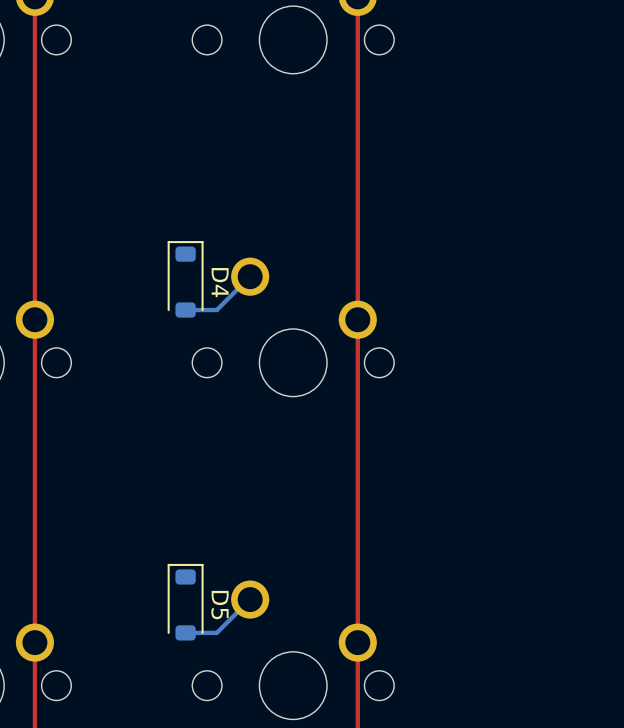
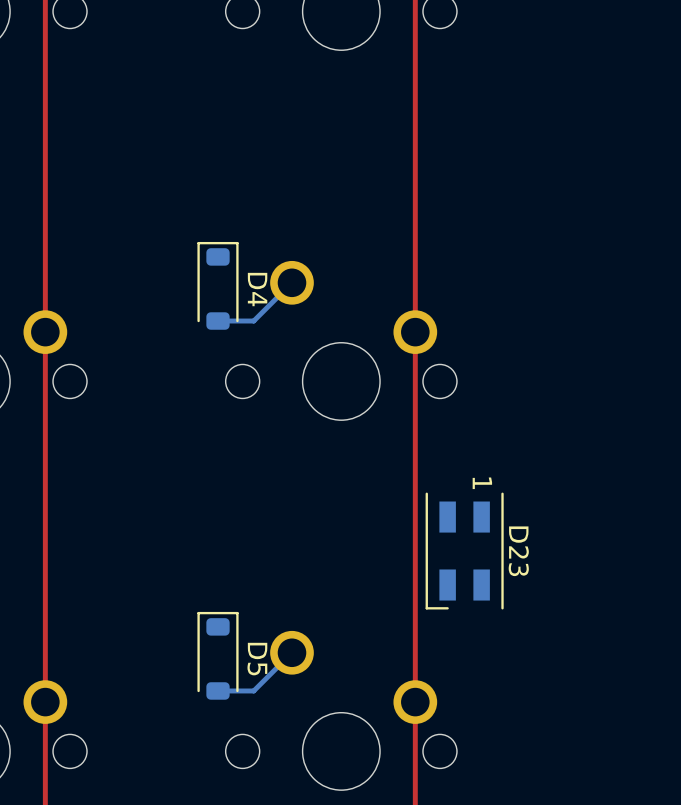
D23: none -> (464, 551)

